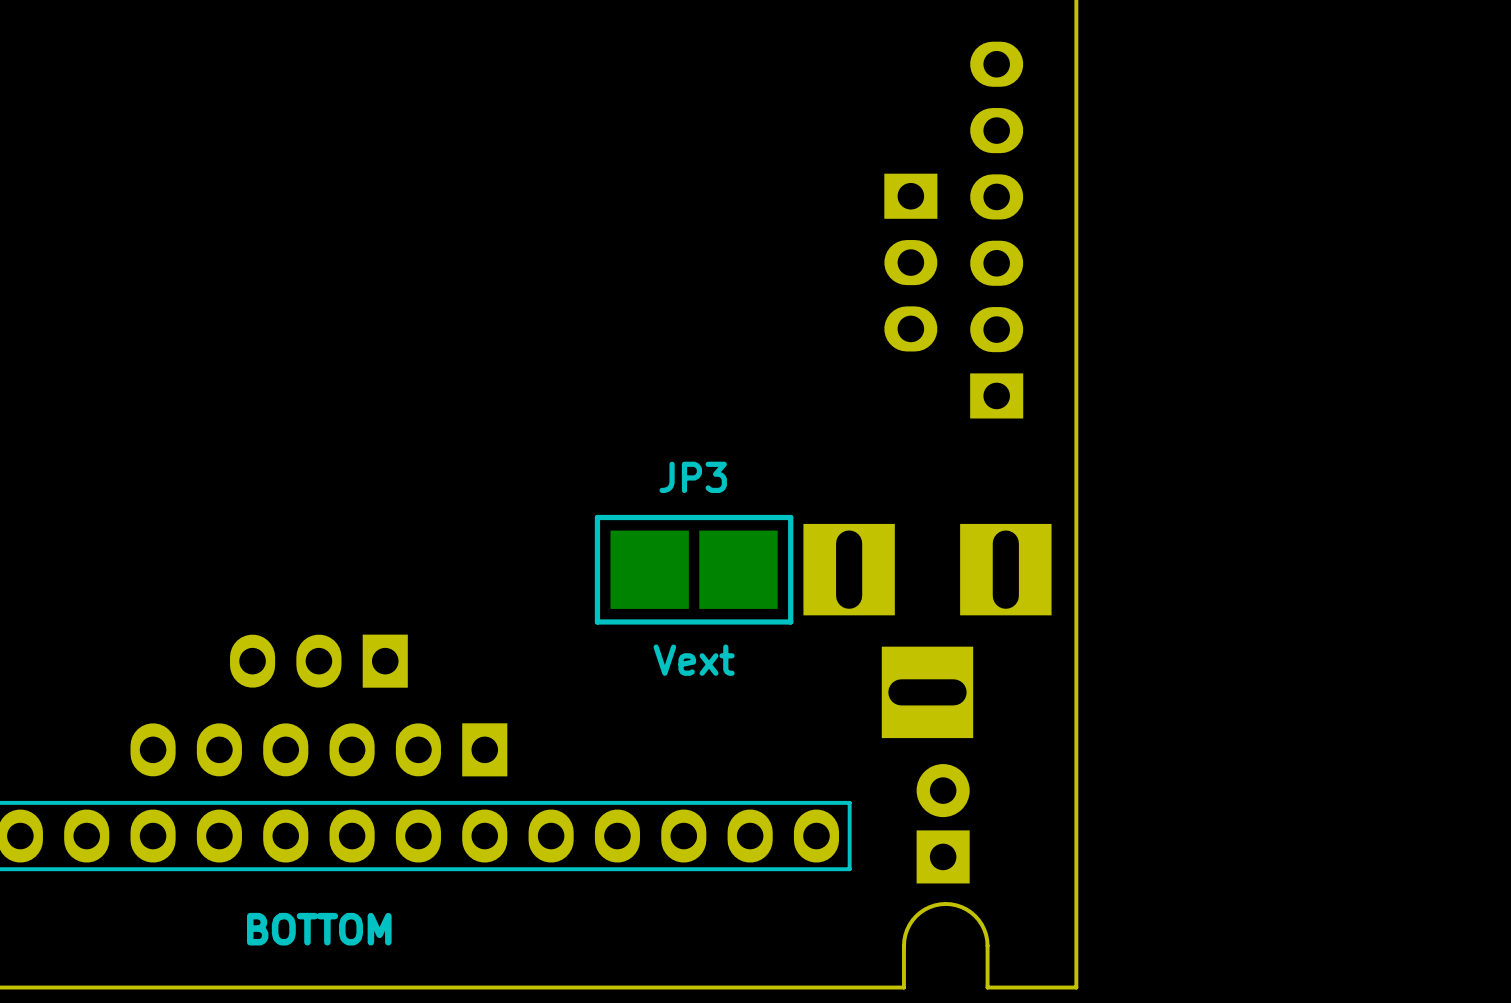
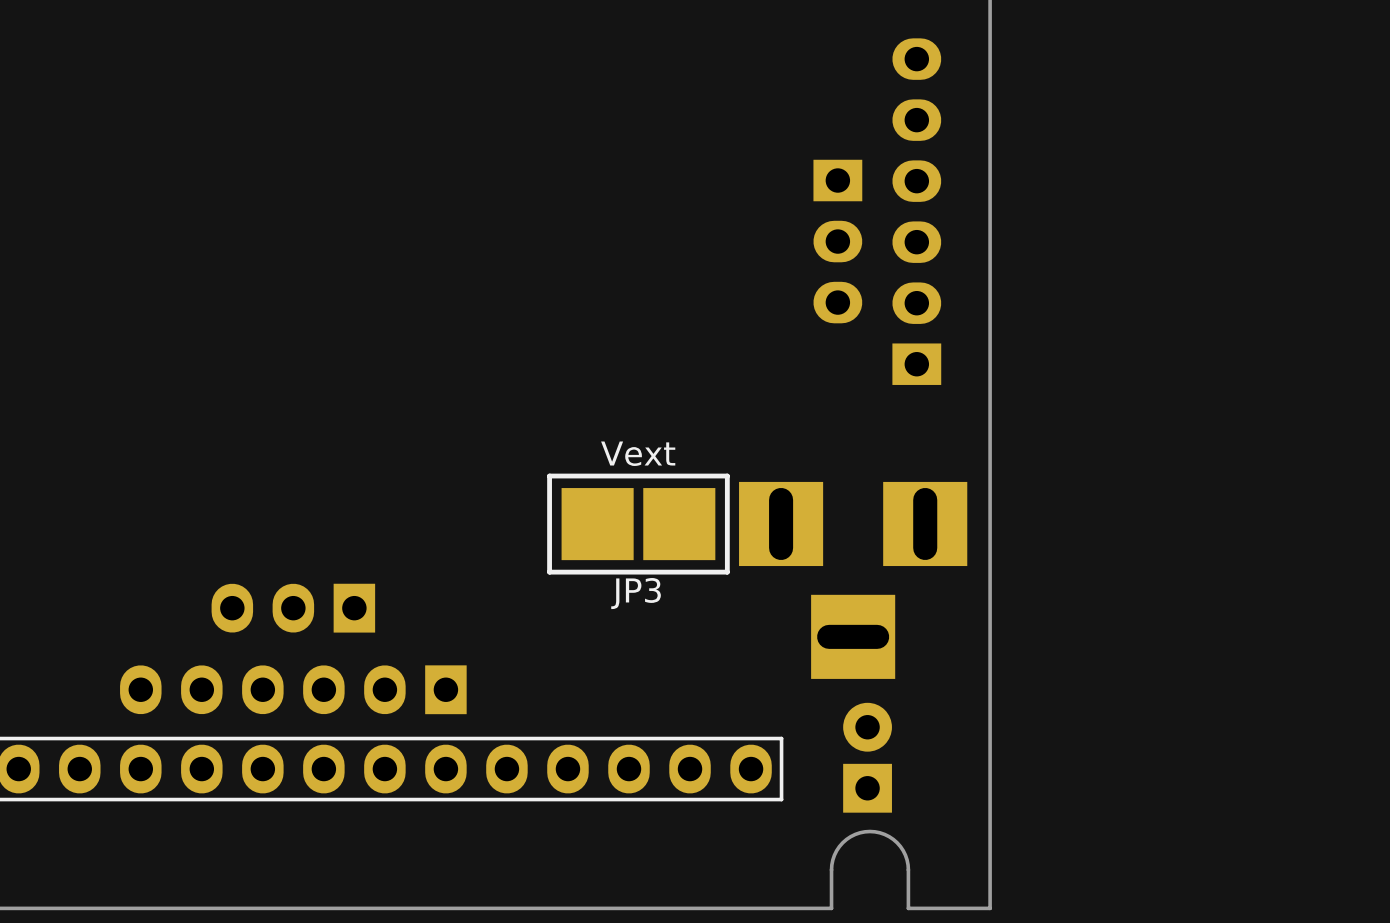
JP3 name position: JP3 (693, 477) -> JP3 (636, 593)
JP3 value position: Vext (694, 660) -> Vext (638, 453)
text: BOTTOM (319, 929) -> none

